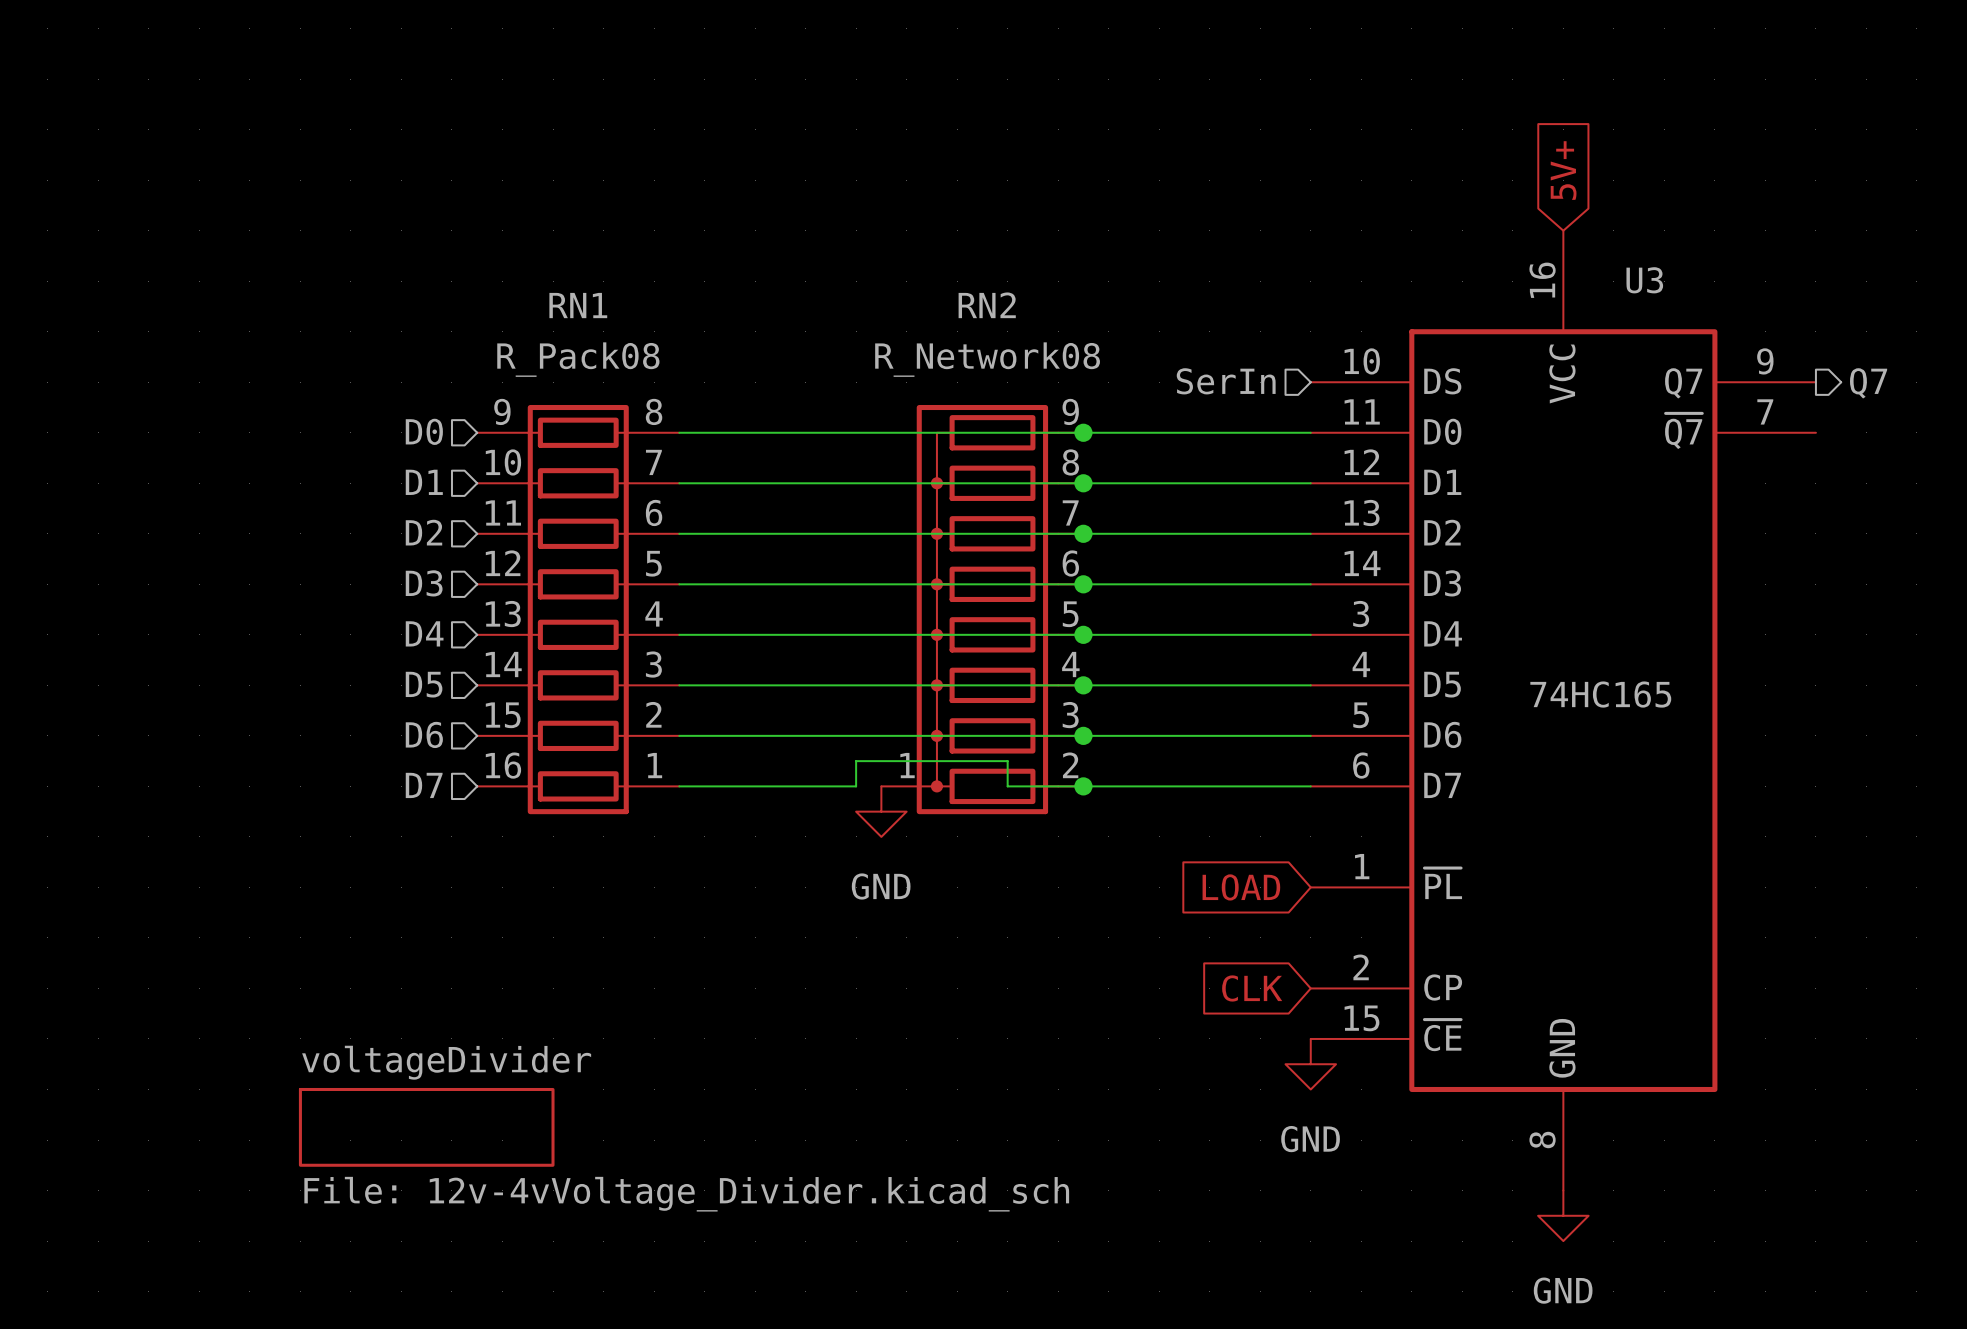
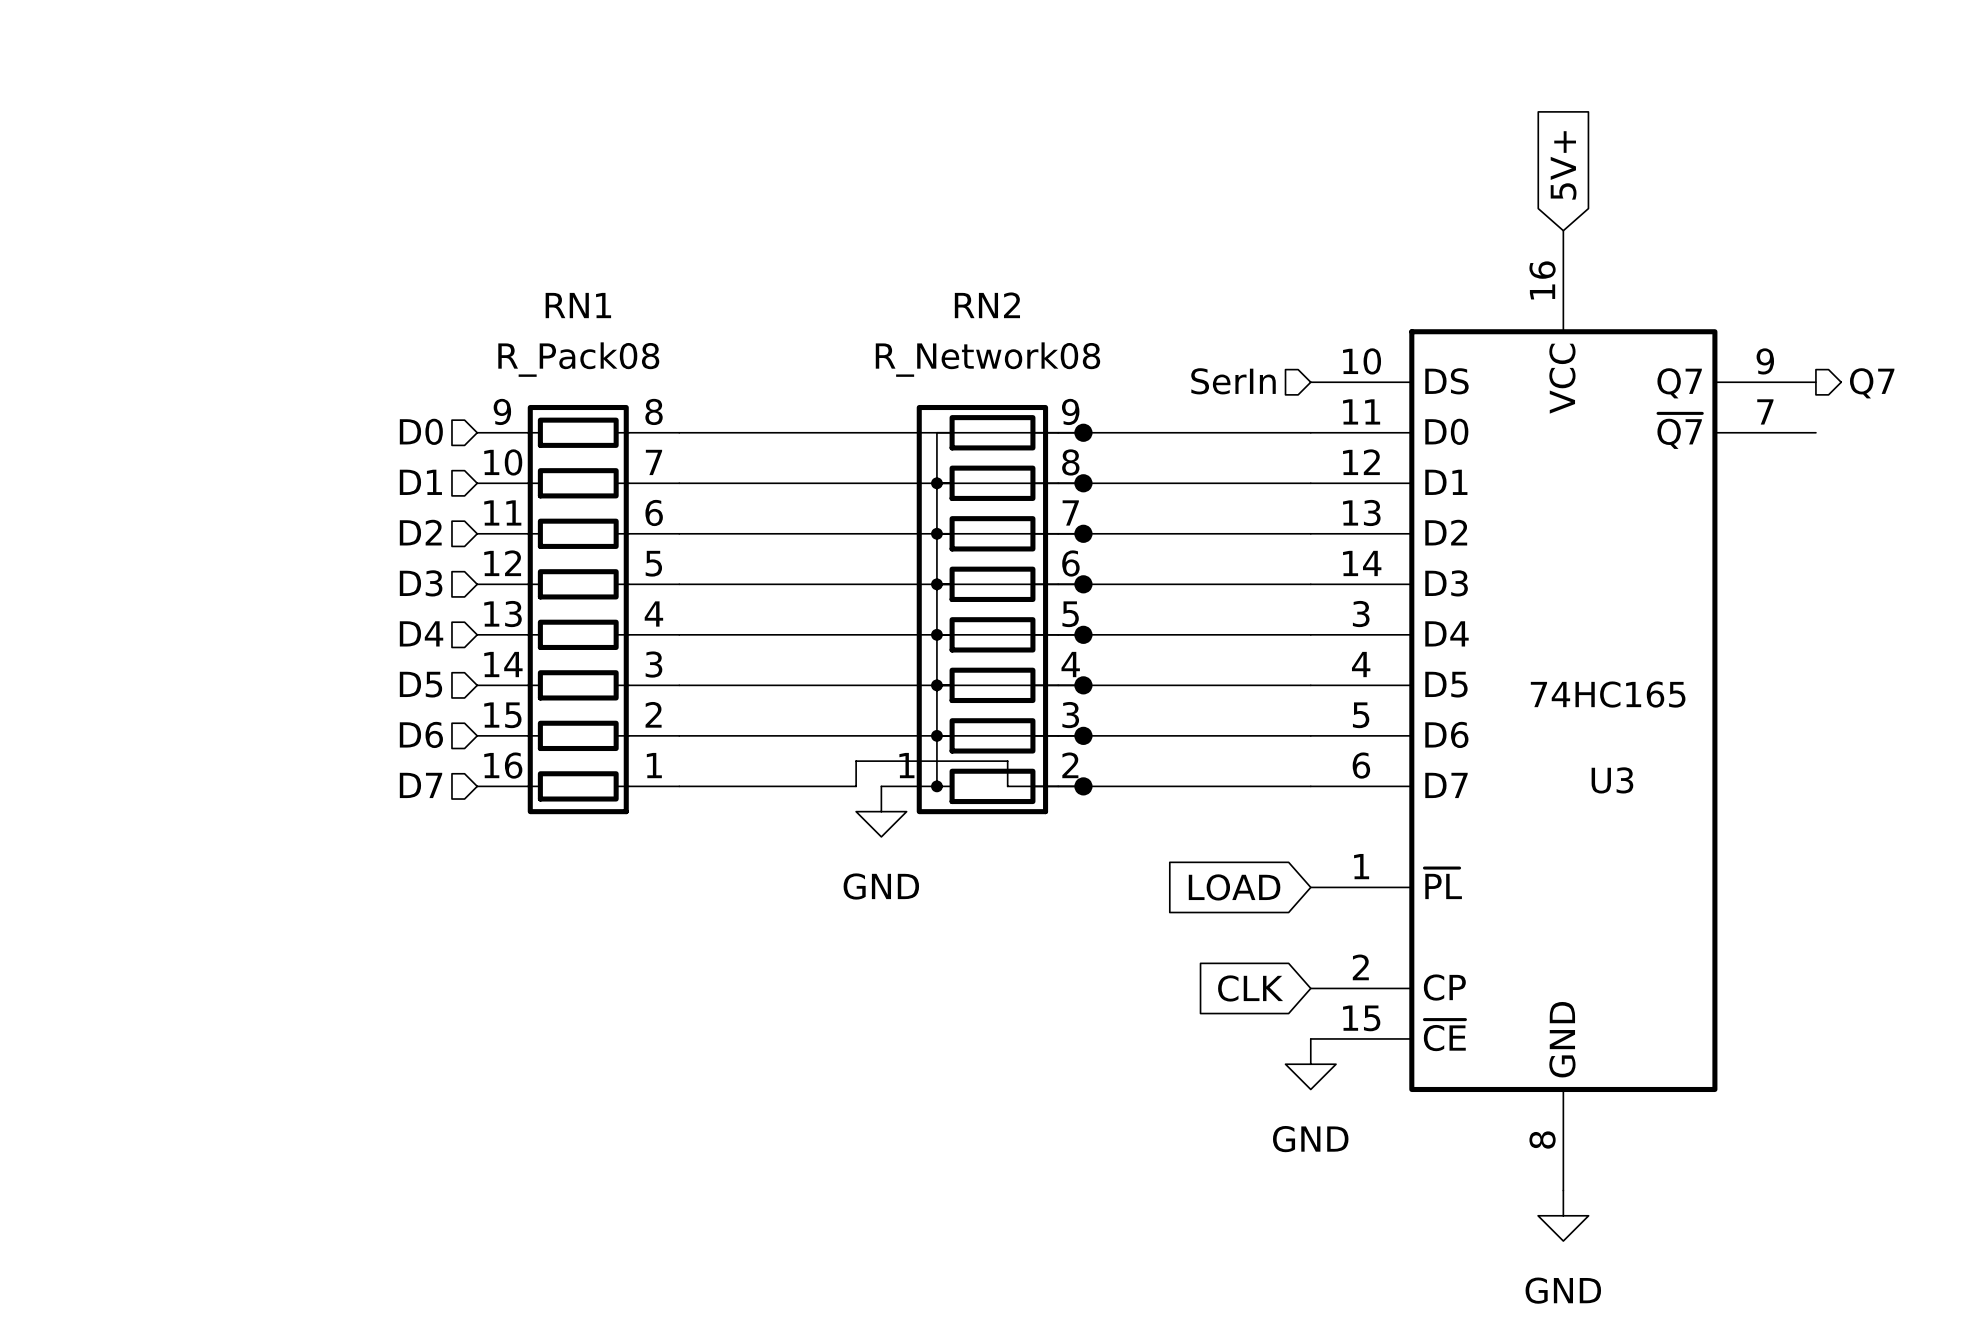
U3 name position: U3 (1644, 280) -> U3 (1612, 780)
sheet voltageDivider: File: 12v-4vVoltage_Divider.kicad_sch (426, 1127) -> none

